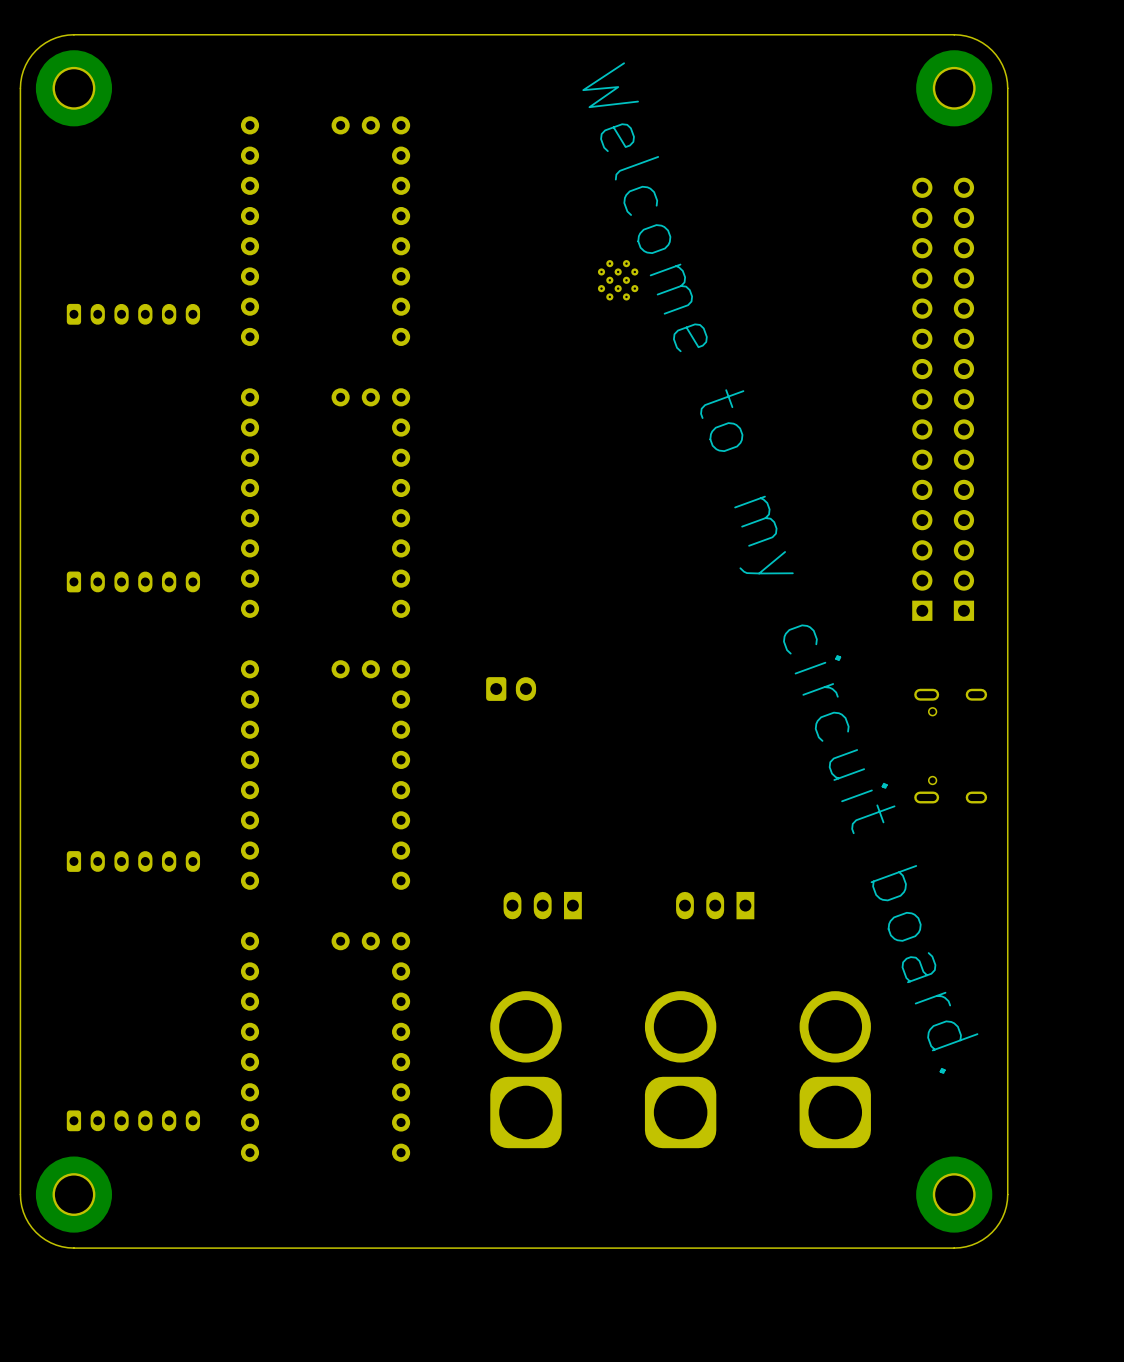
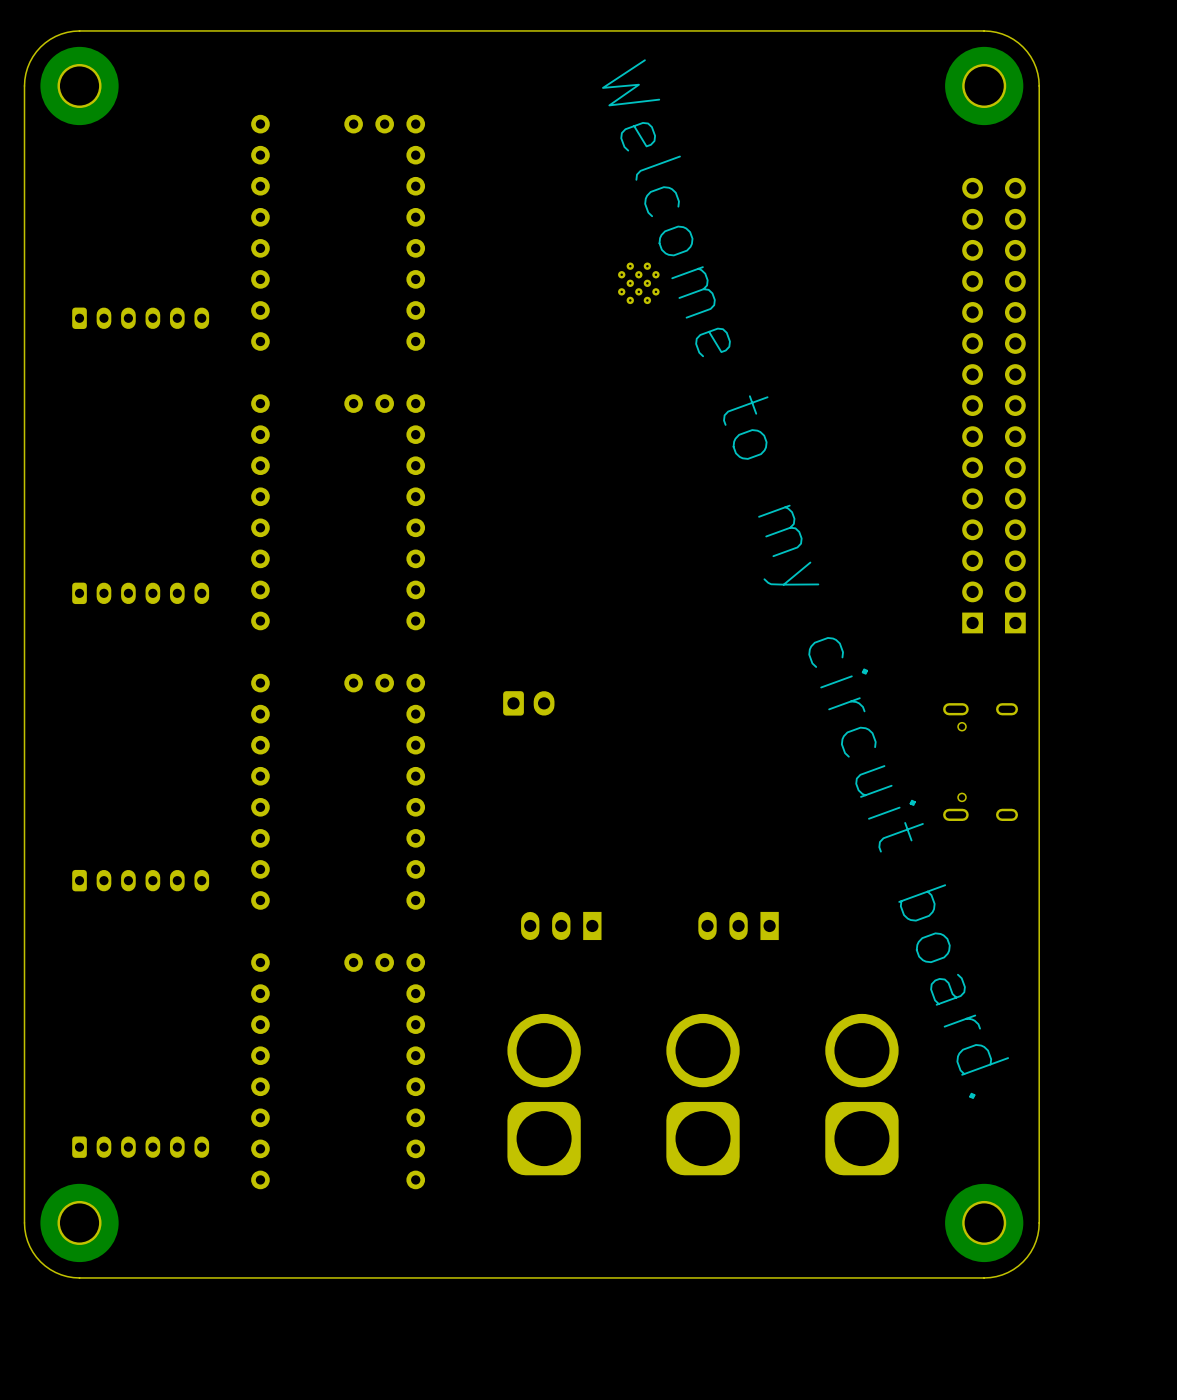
part: (922, 399) -> none
part: none -> (972, 405)
part: (963, 399) -> none
part: none -> (1015, 405)

